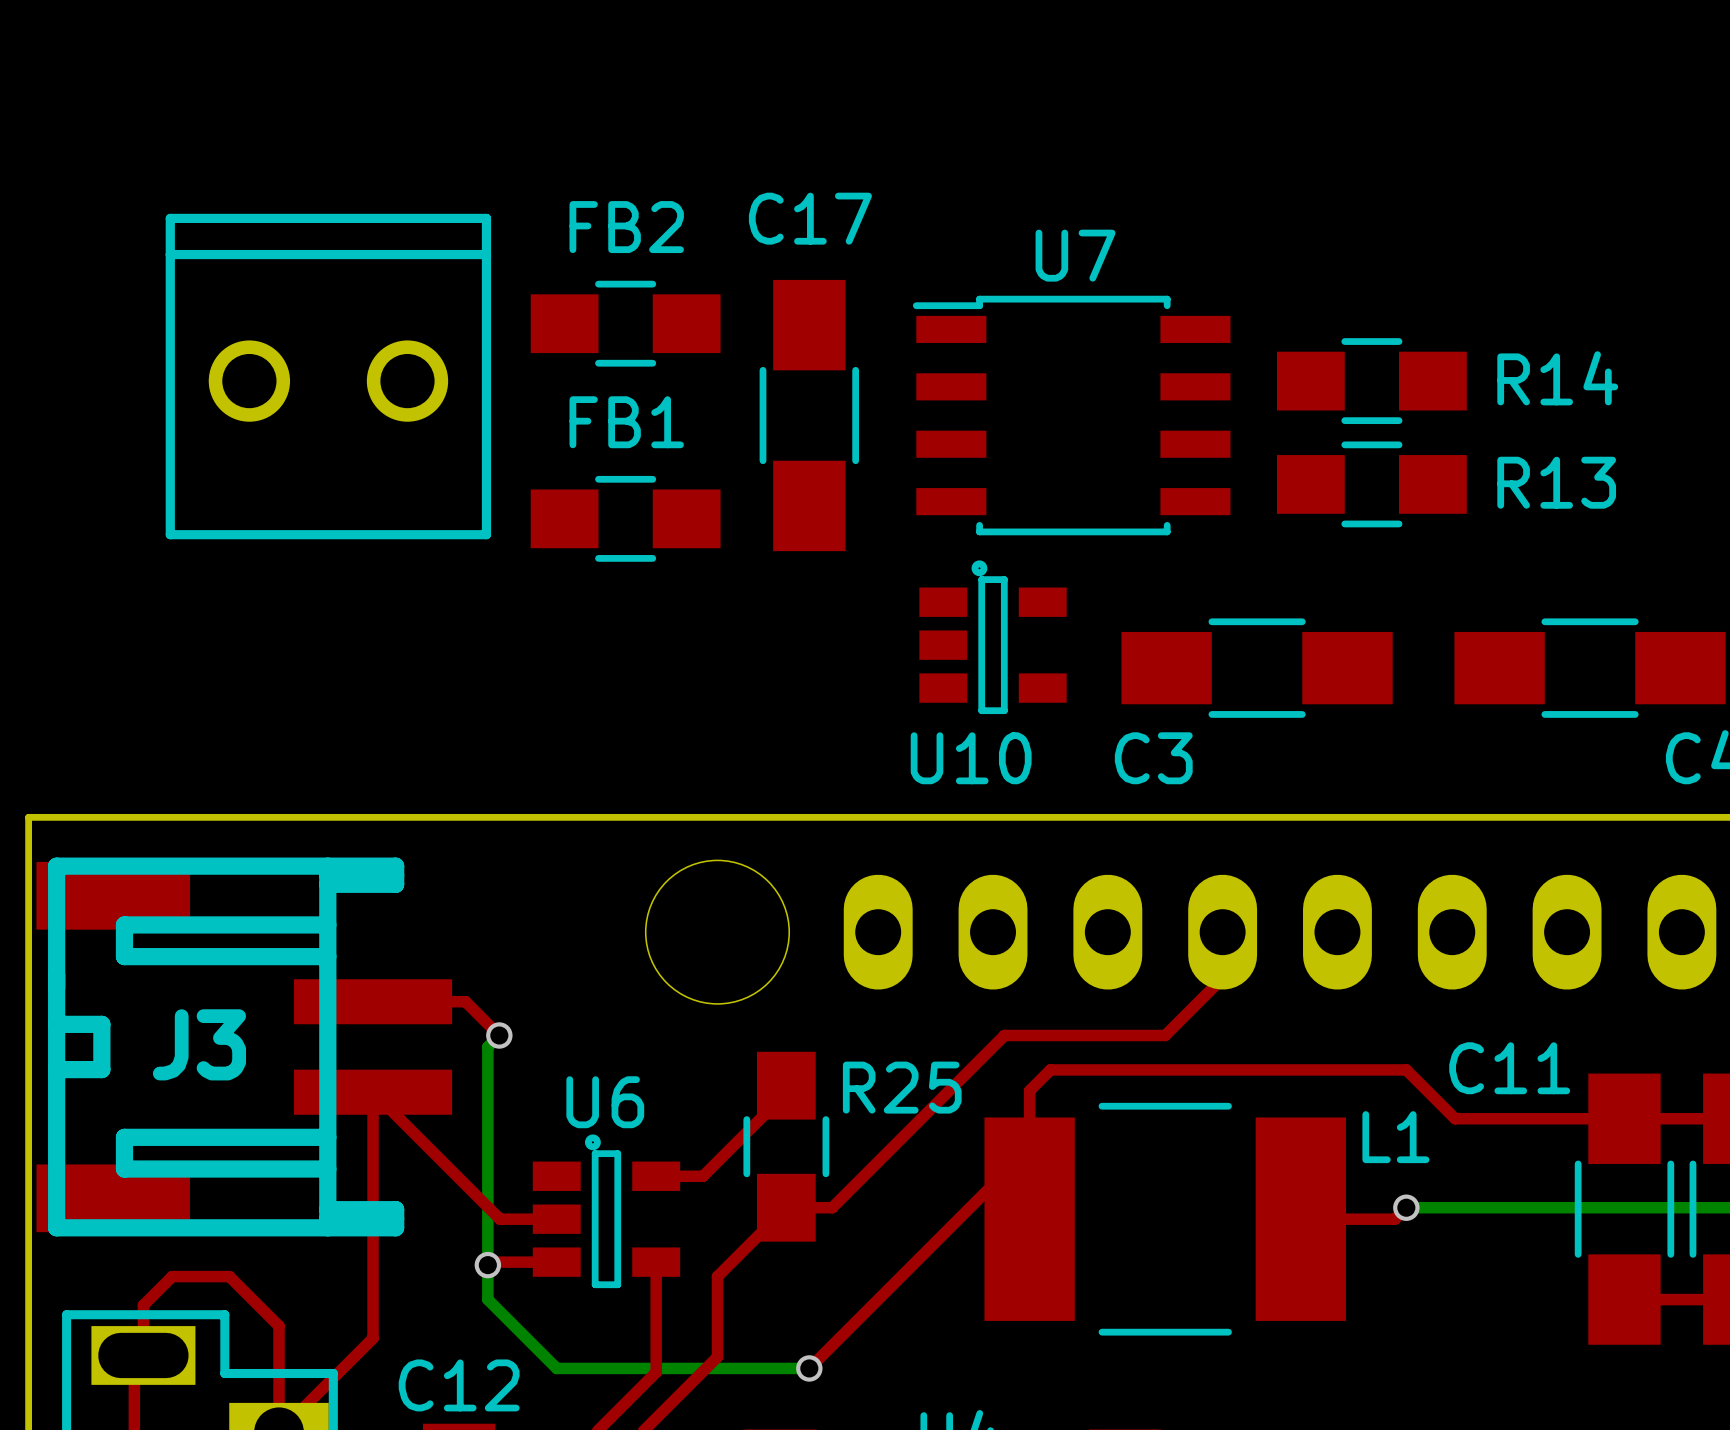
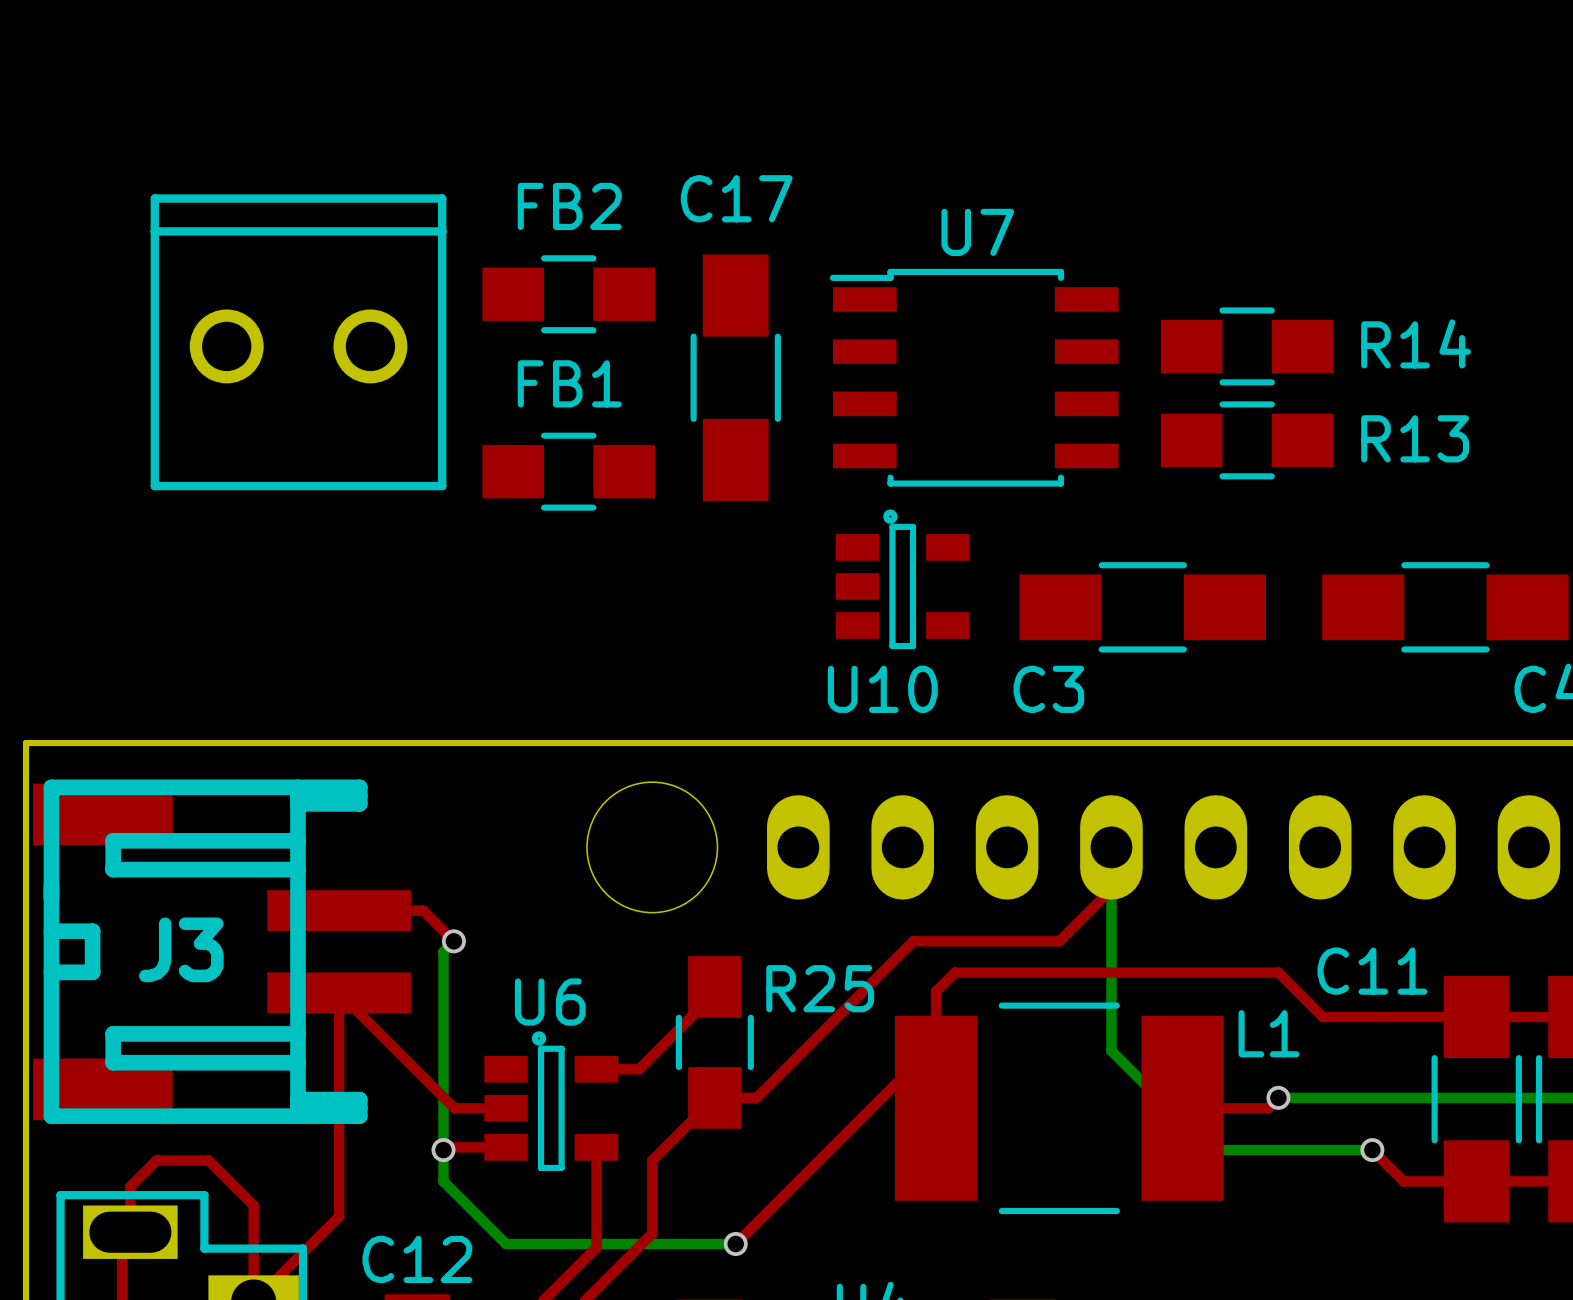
bottom track: none -> (1111, 847) (1111, 1050) (1210, 1150) (1372, 1150)
top track: none -> (1372, 1150) (1403, 1181) (1476, 1181)
via: none -> (1372, 1150)

